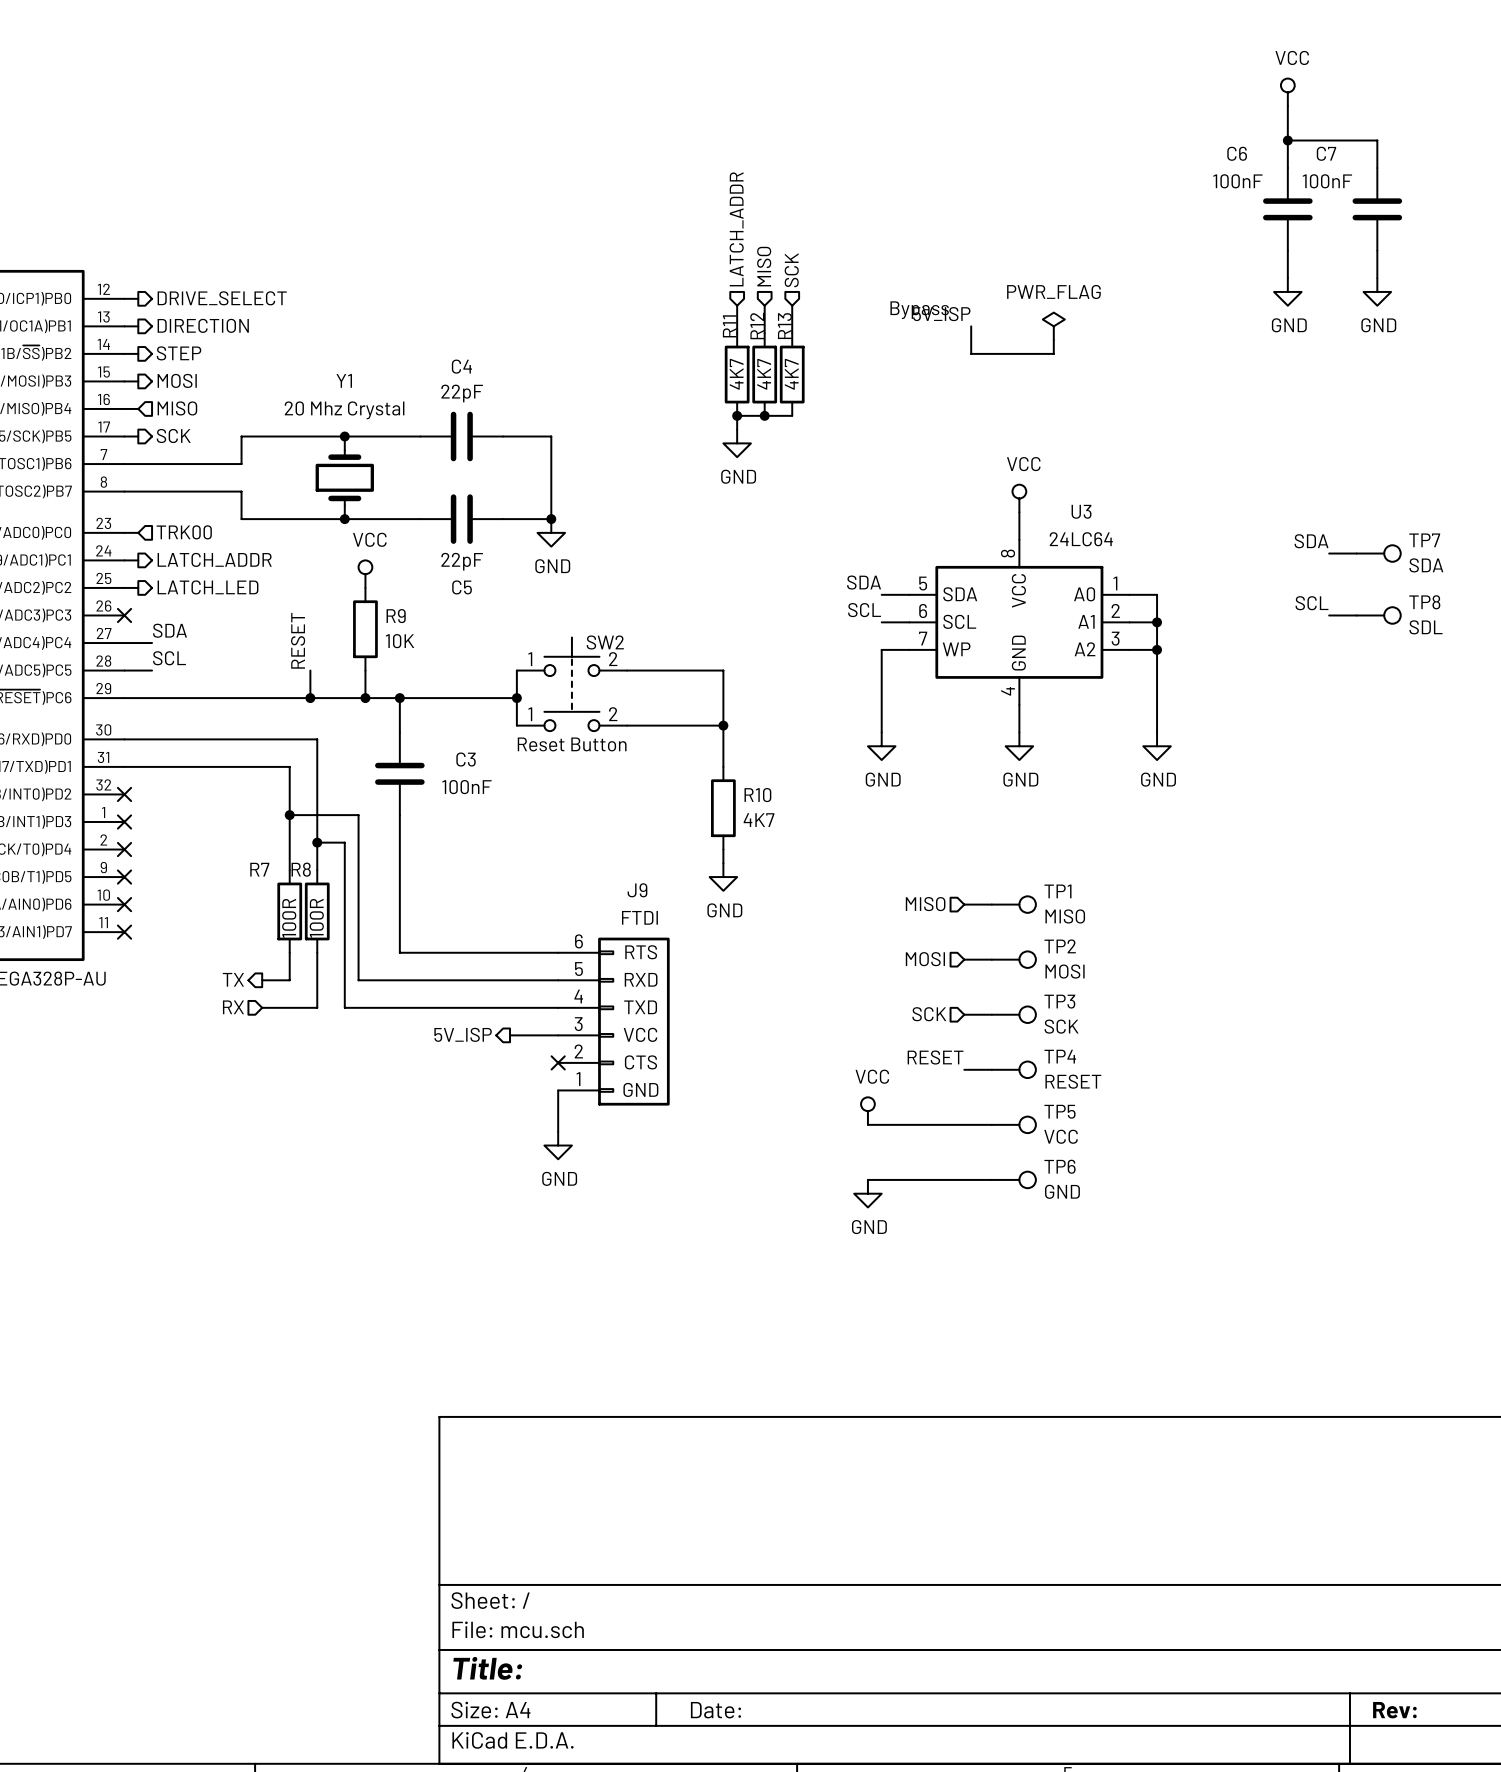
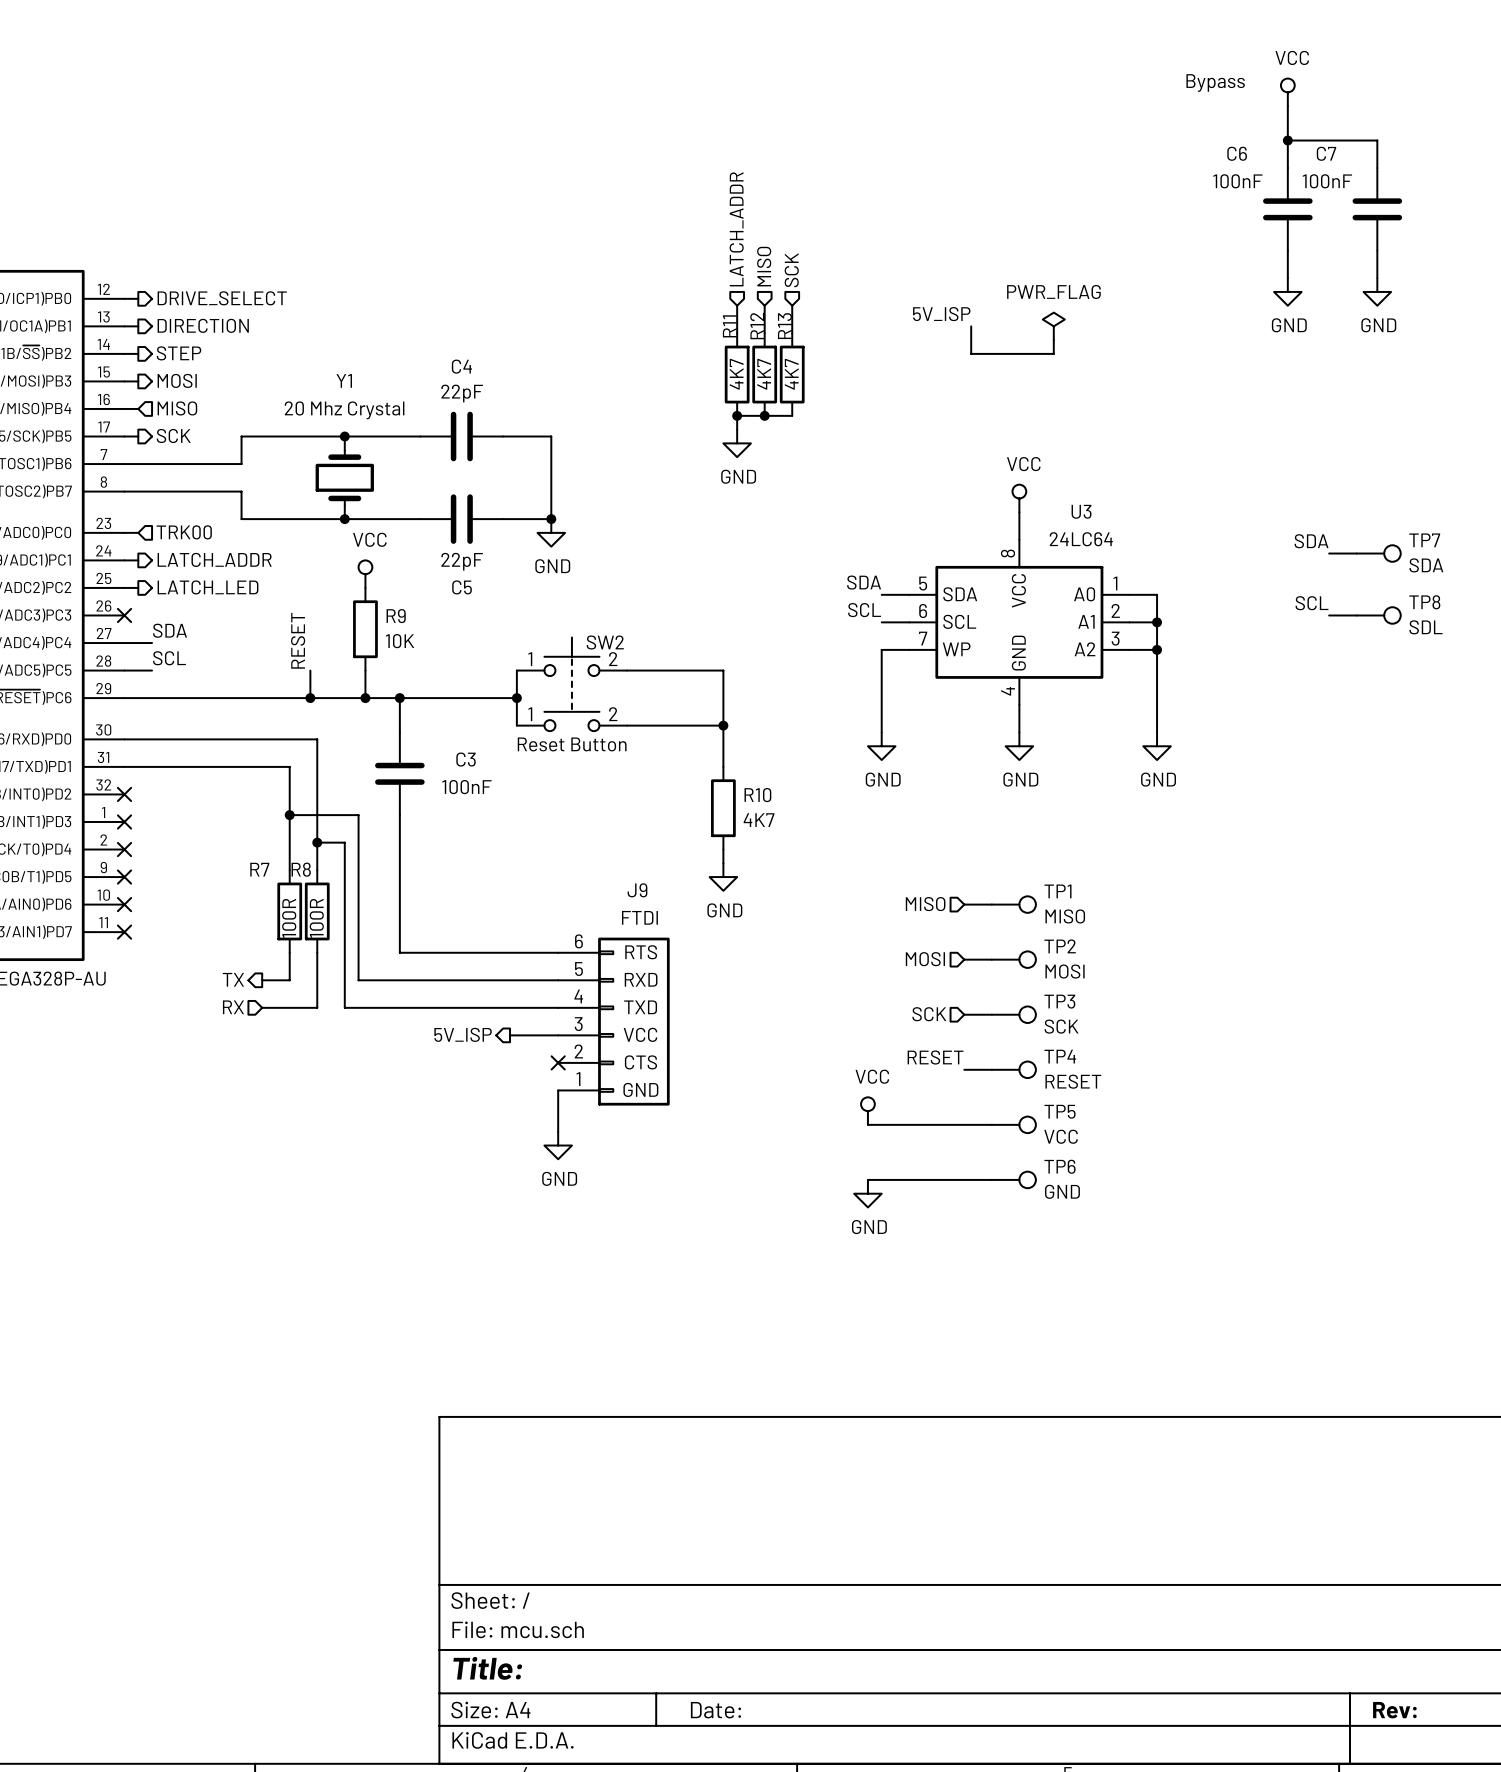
text: none -> Bypass (1215, 83)
text: Bypass (919, 310) -> none

